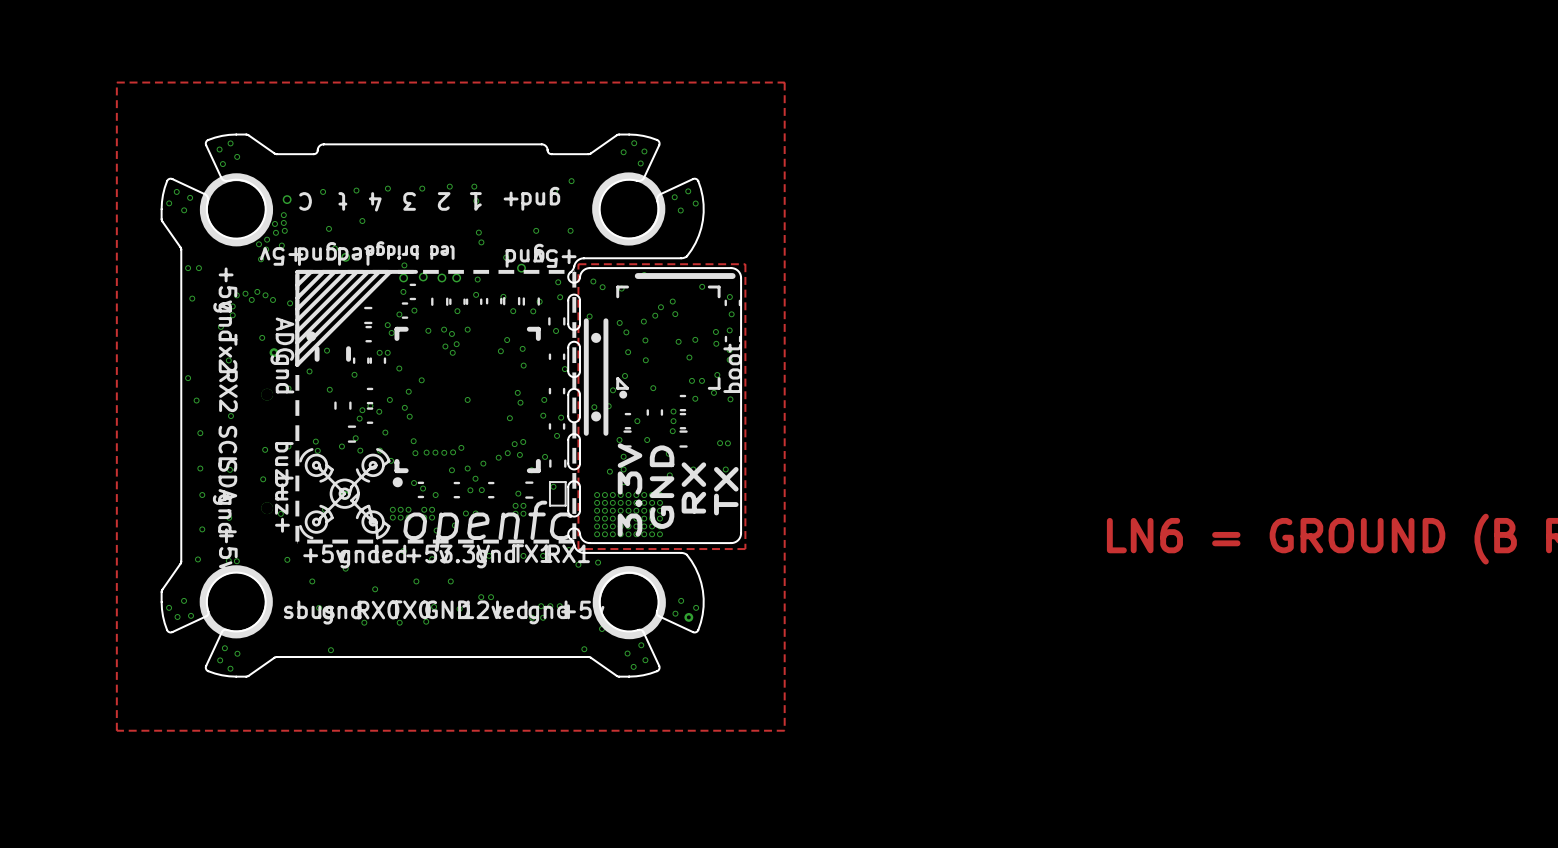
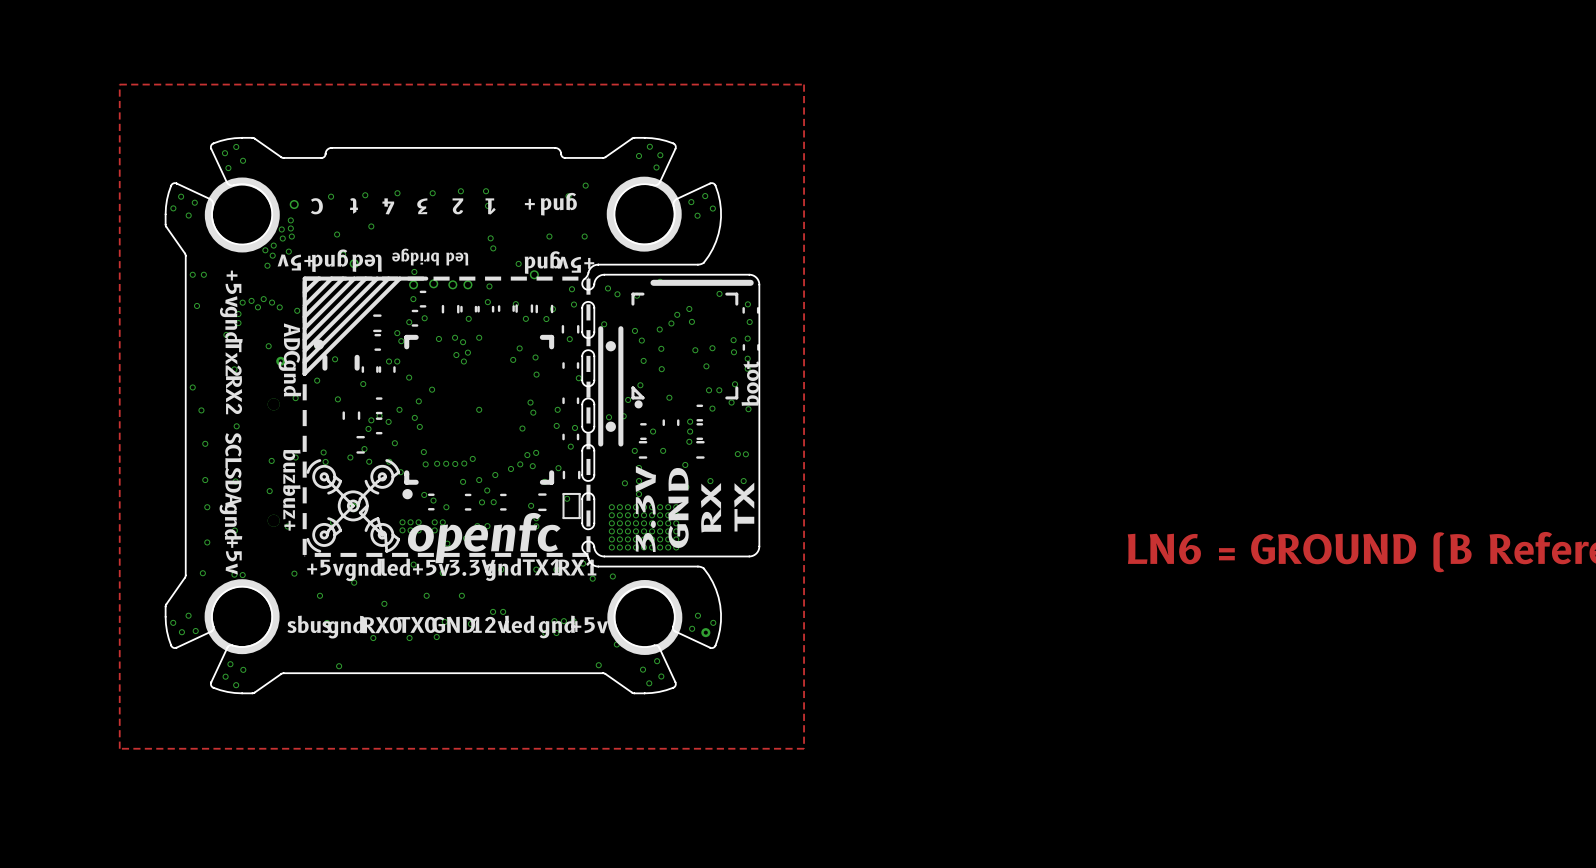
zone outline: (578, 264) (745, 264) (745, 549) (578, 549) (578, 264) -> none

